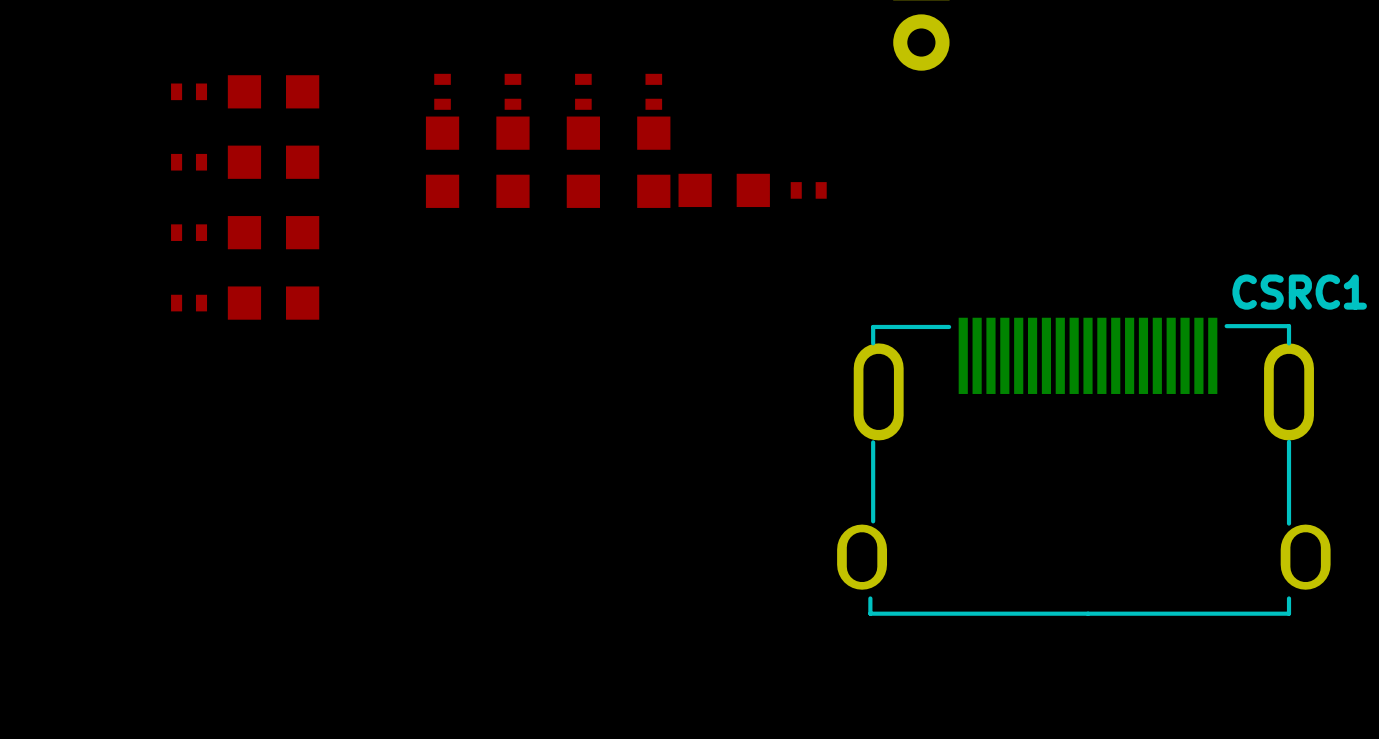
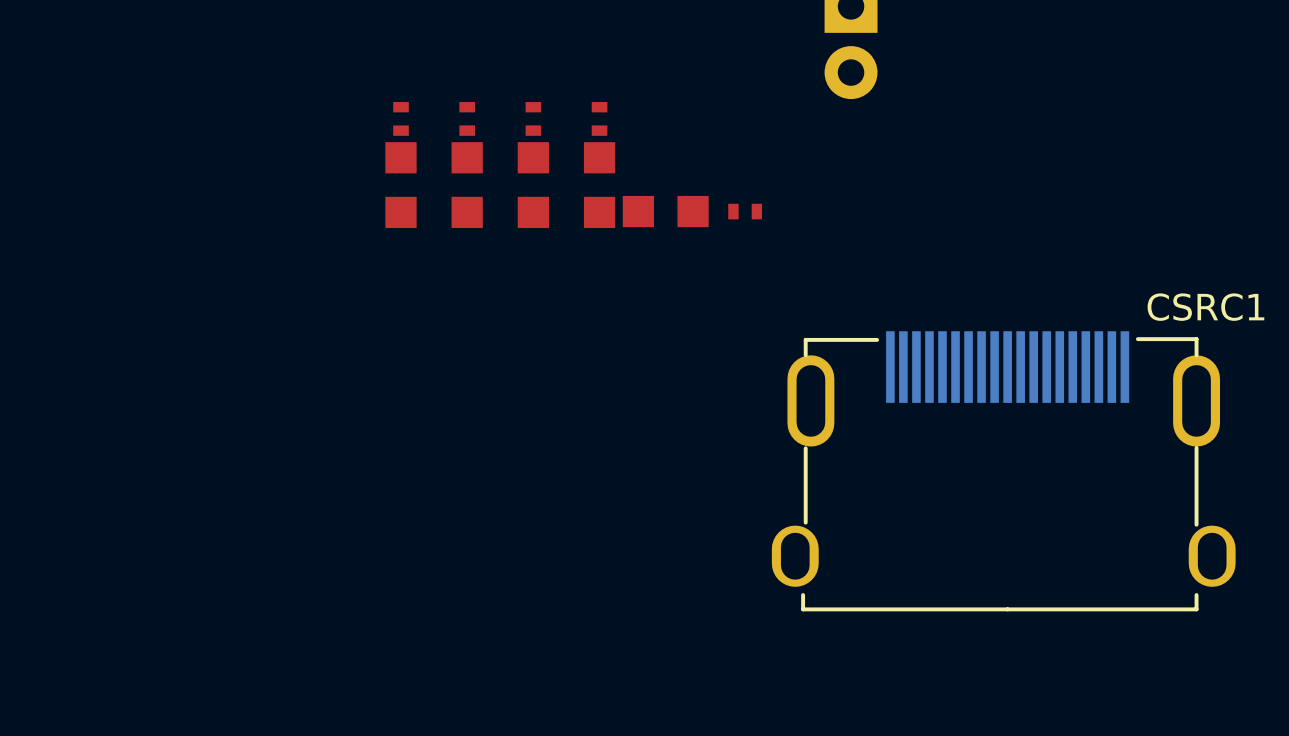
part: (189, 91) -> none
part: (273, 91) -> none
part: (189, 162) -> none
part: (273, 162) -> none
part: (189, 232) -> none
part: (273, 232) -> none
part: (189, 303) -> none
part: (273, 303) -> none

